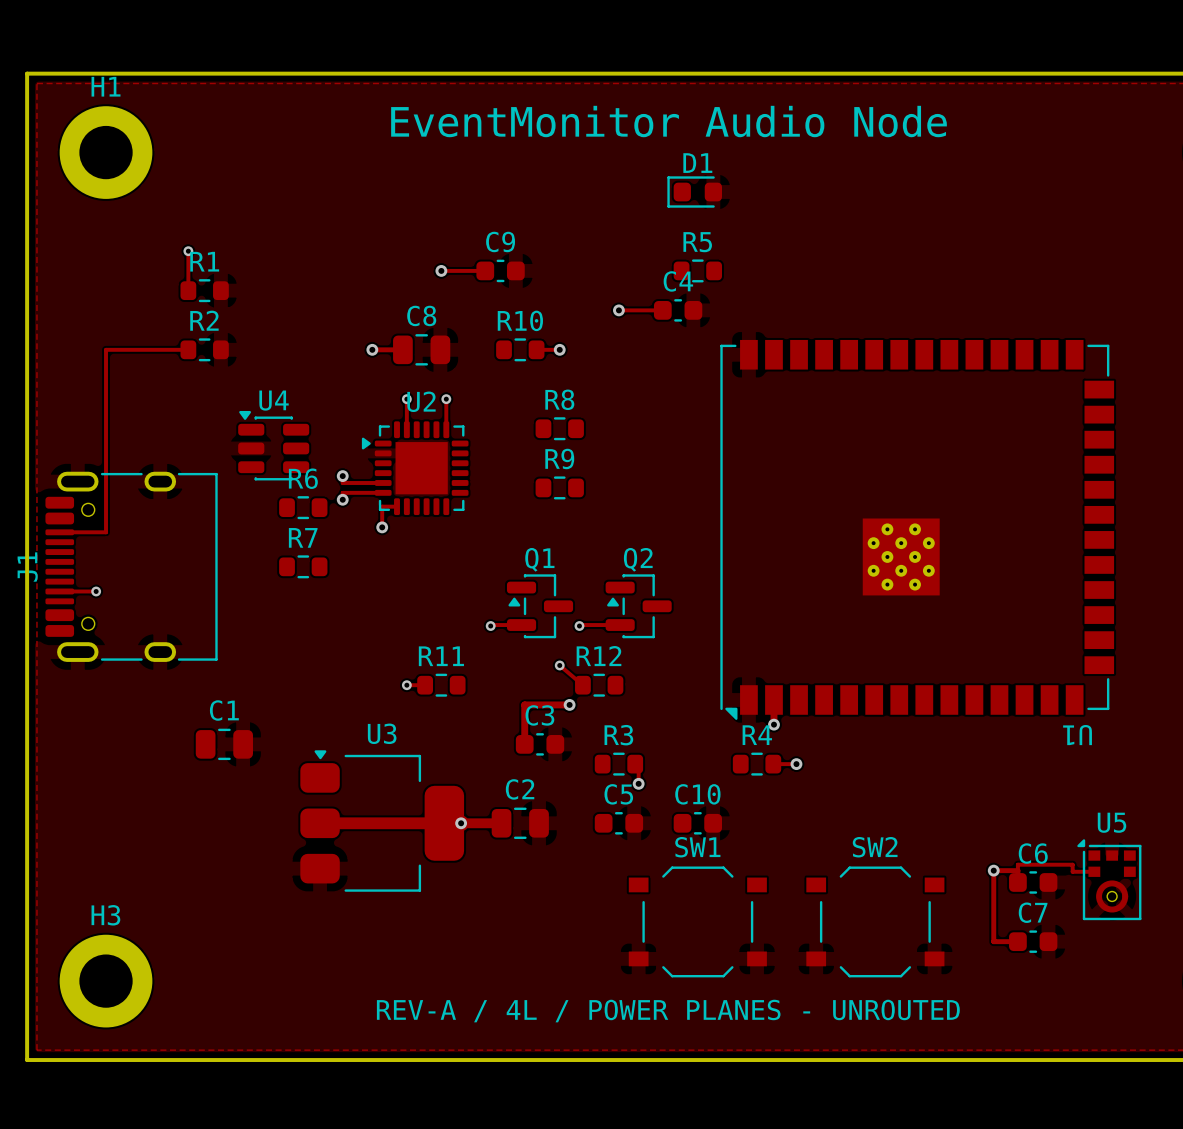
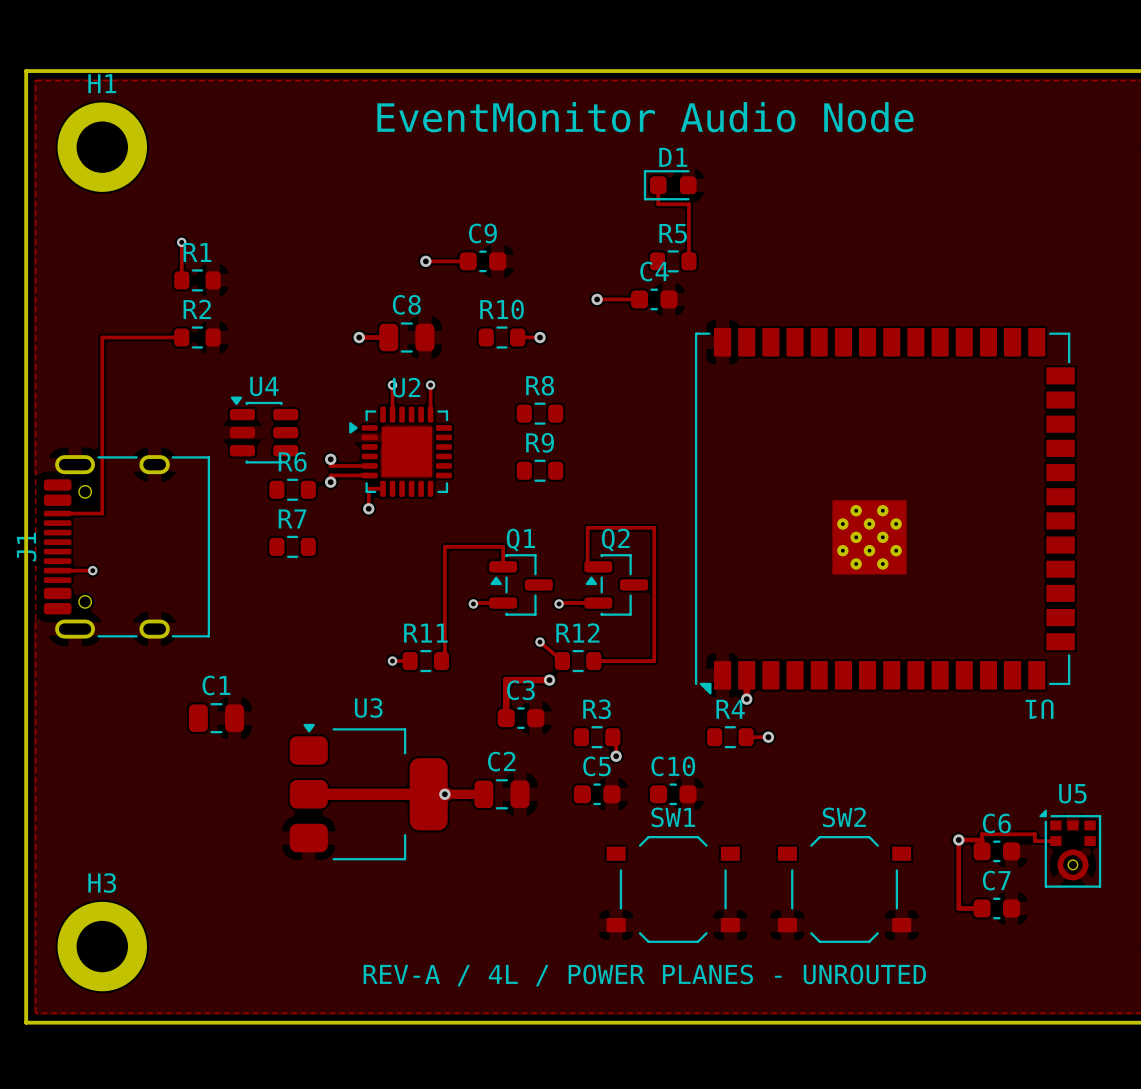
track: none -> (658, 185) (658, 204) (688, 204) (688, 261)
track: none -> (503, 566) (503, 546) (444, 546) (444, 651) (441, 661)
track: none -> (598, 566) (587, 566) (587, 527) (654, 527) (654, 661) (593, 661)

